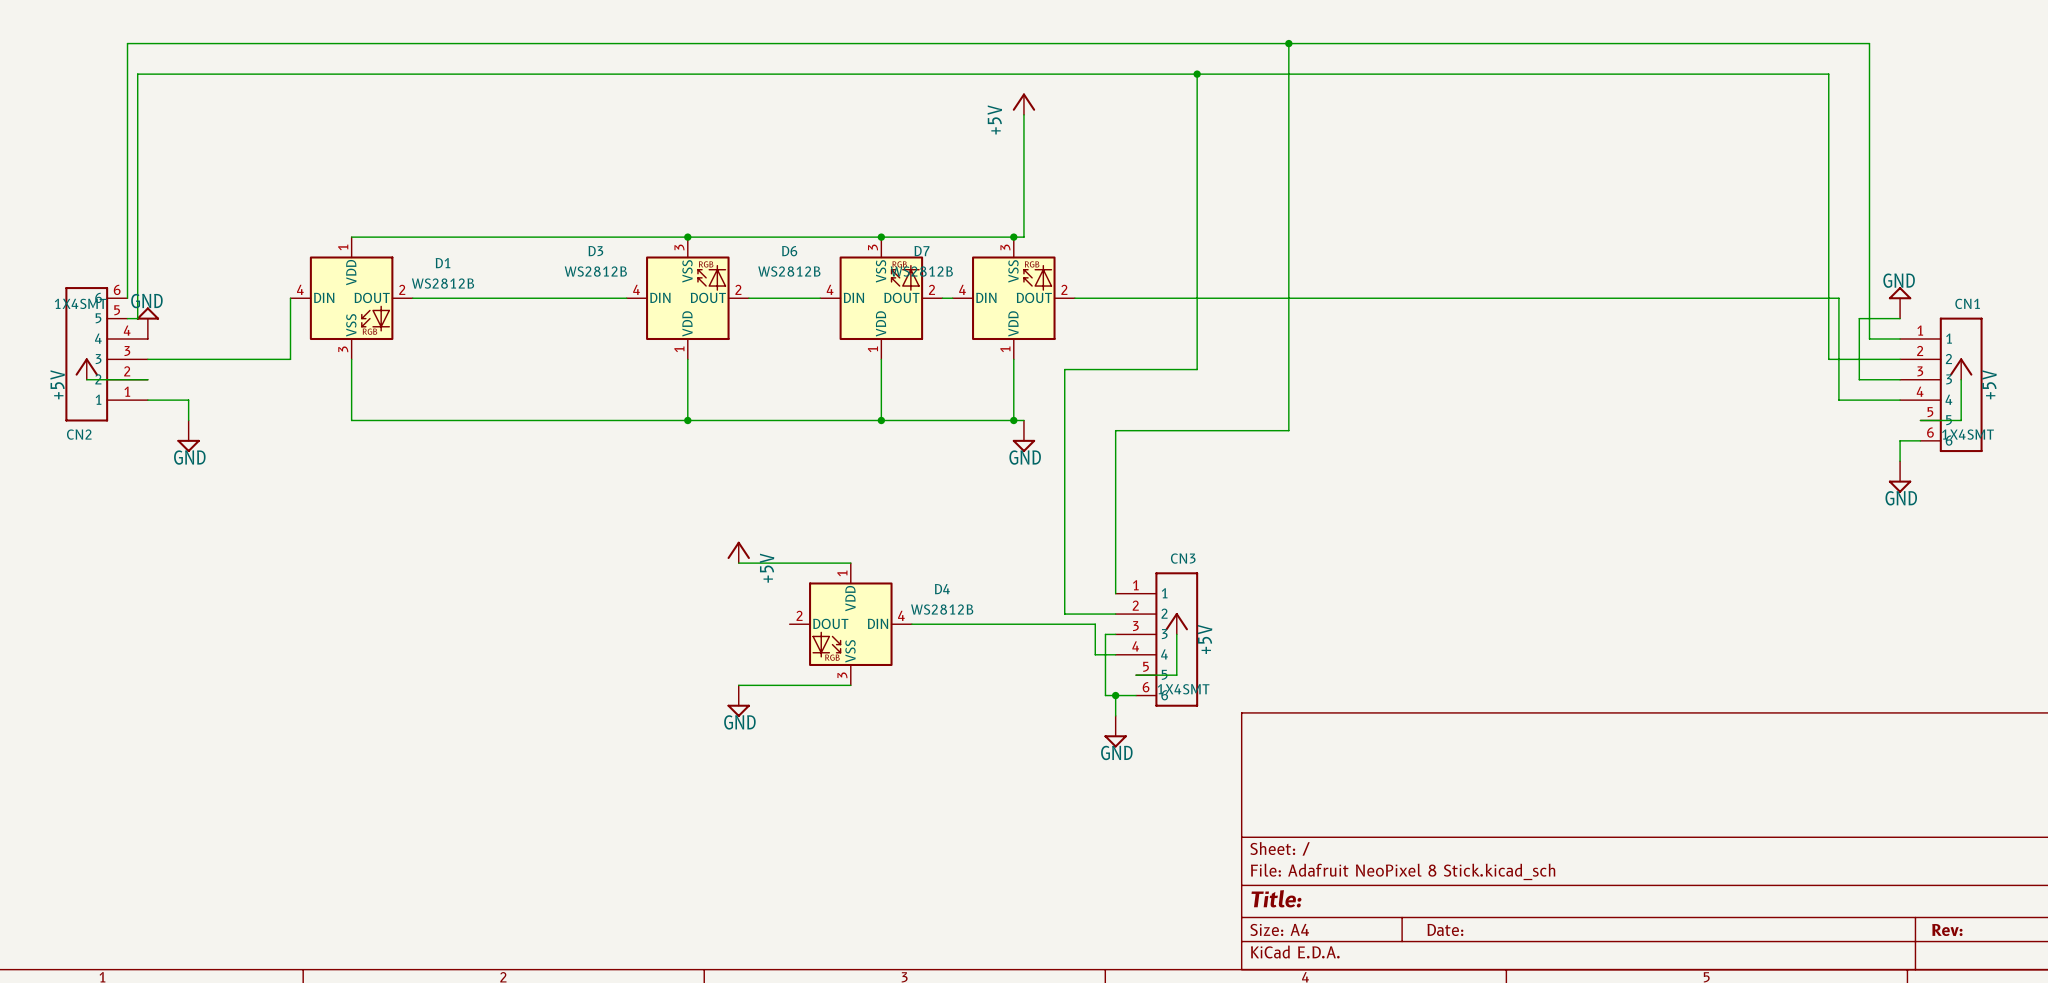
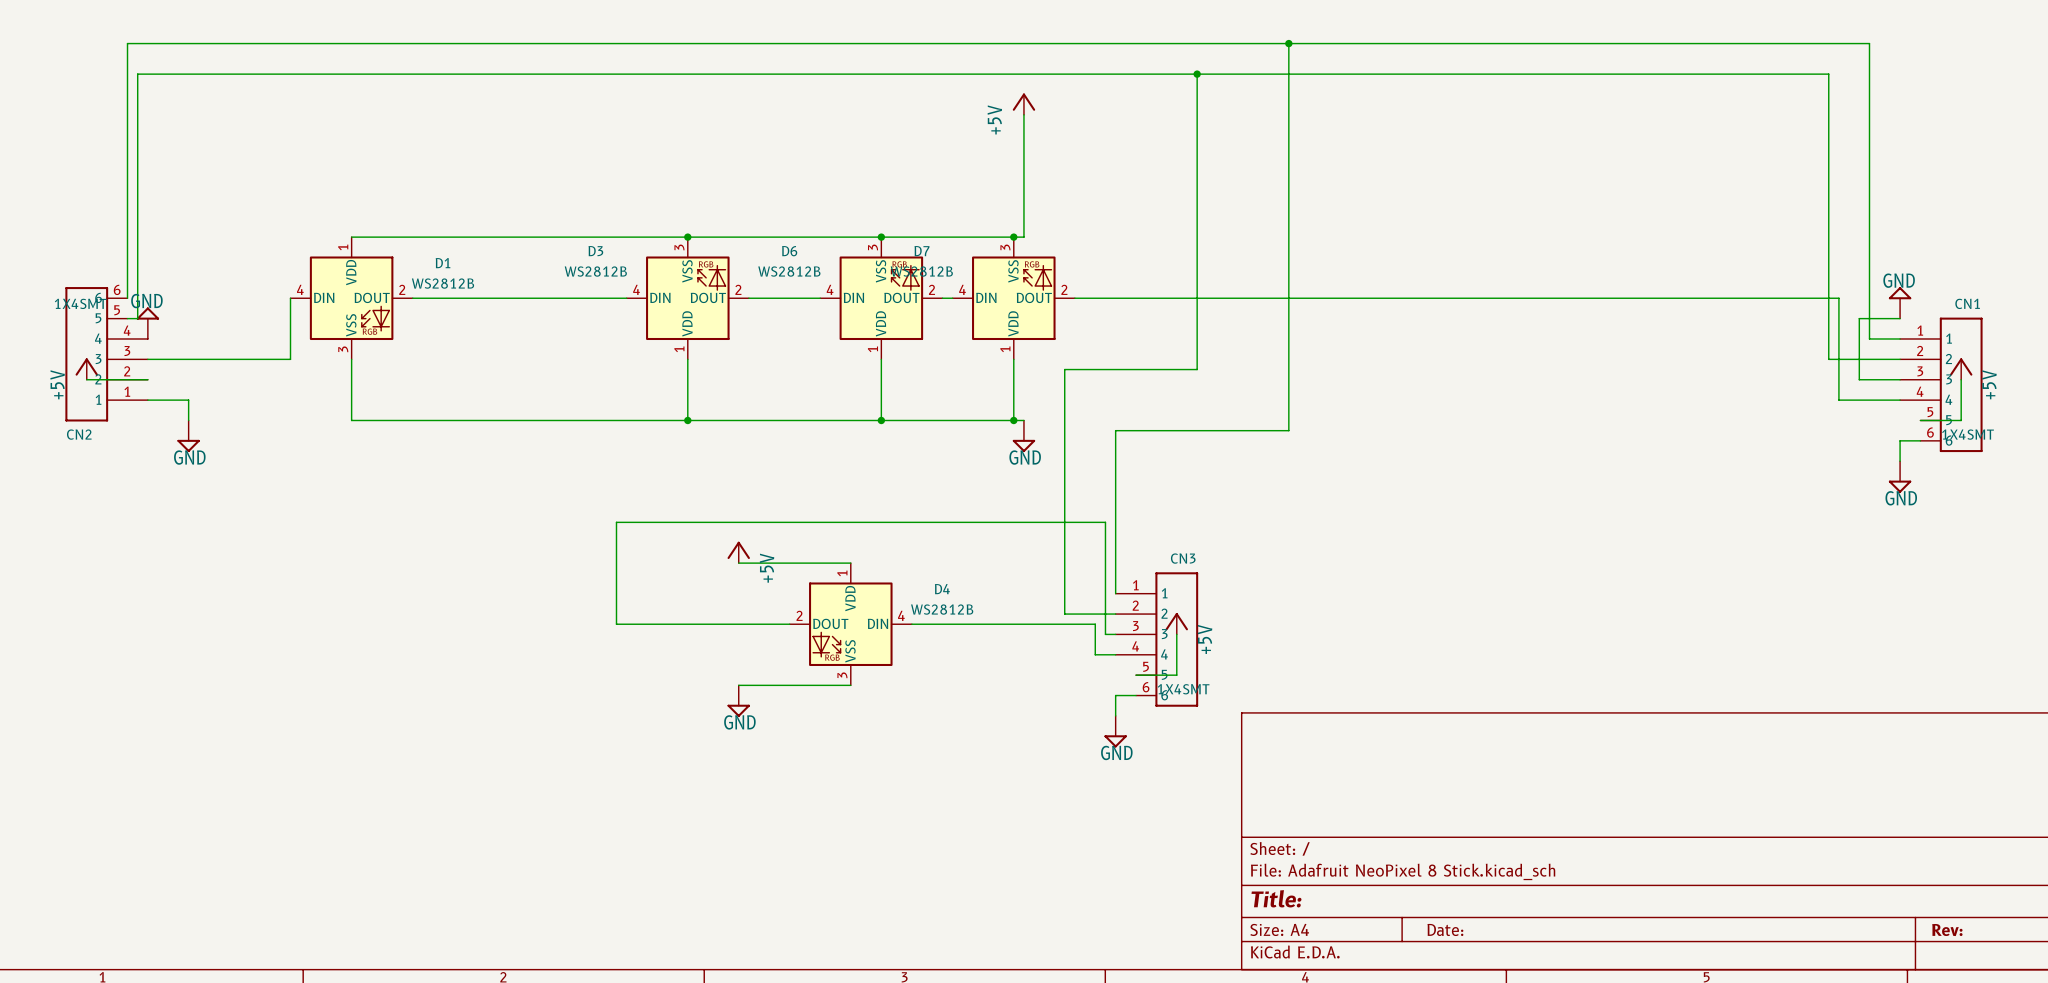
wire: (1105, 634) (1105, 695) (1115, 695) -> (1105, 634) (1105, 522) (616, 522) (616, 624) (789, 624)
junction: (1115, 695) -> none

